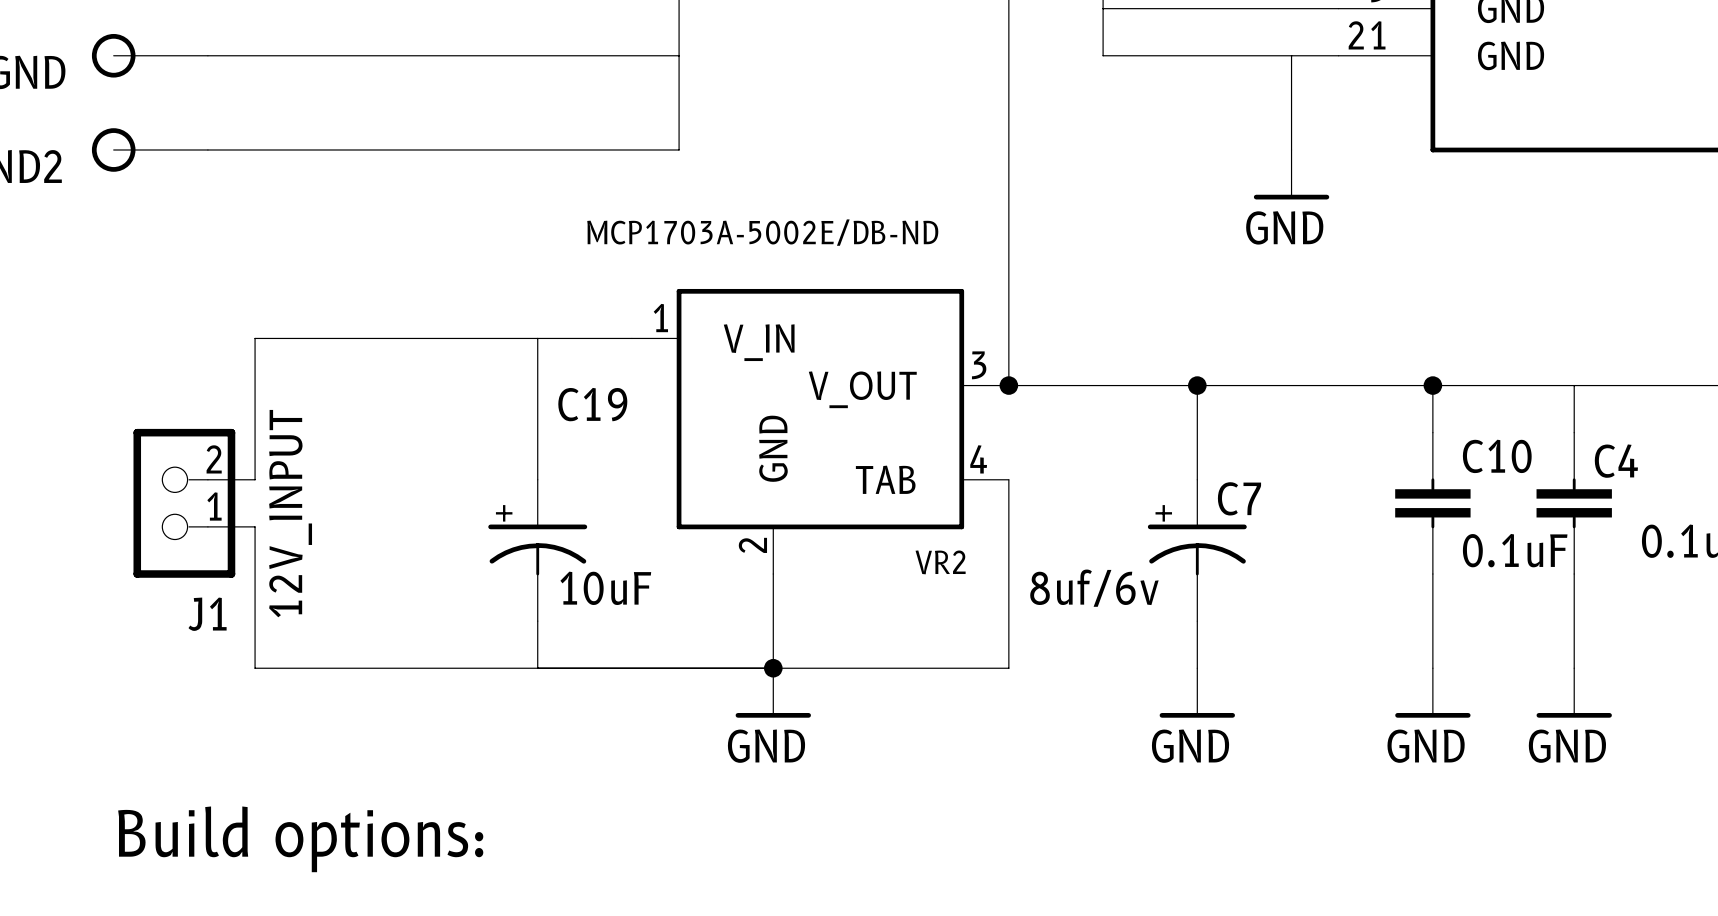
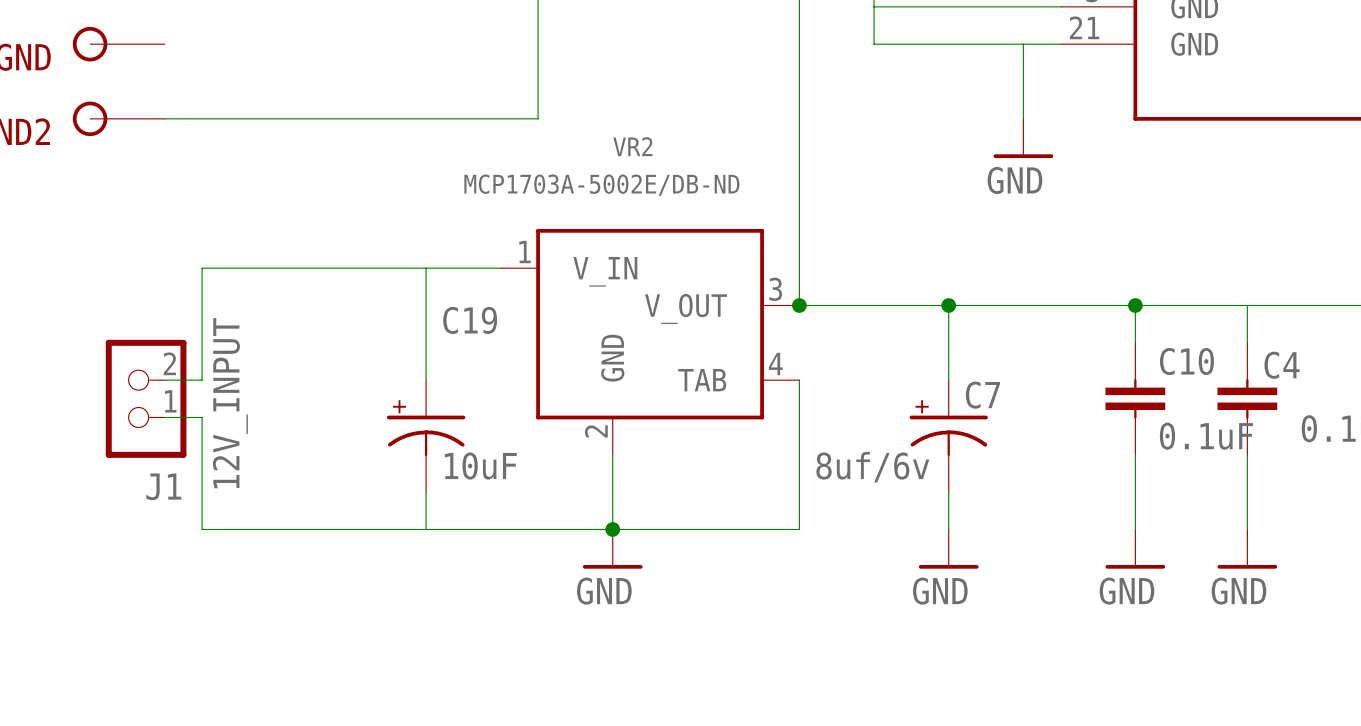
wire: (207, 55) (679, 55) -> none
VR2 name position: VR2 (940, 562) -> VR2 (632, 146)
text: Build options: (300, 839) -> none

